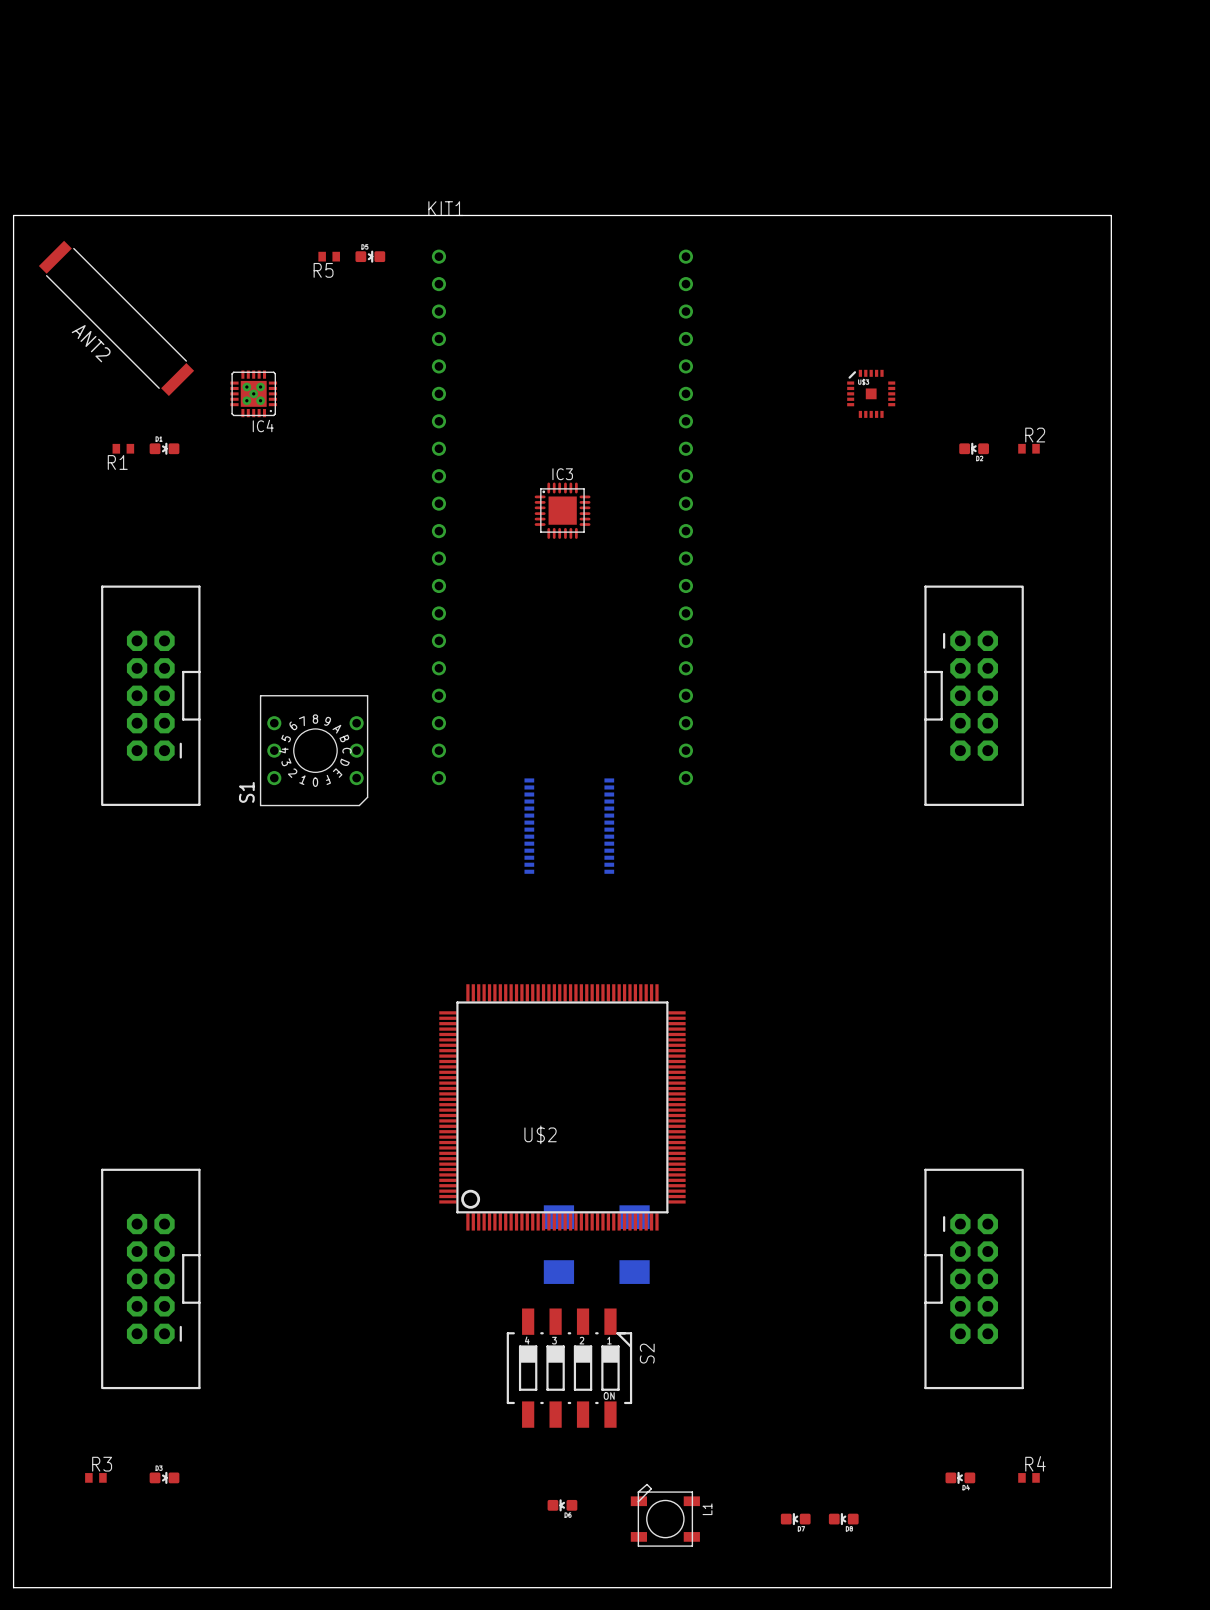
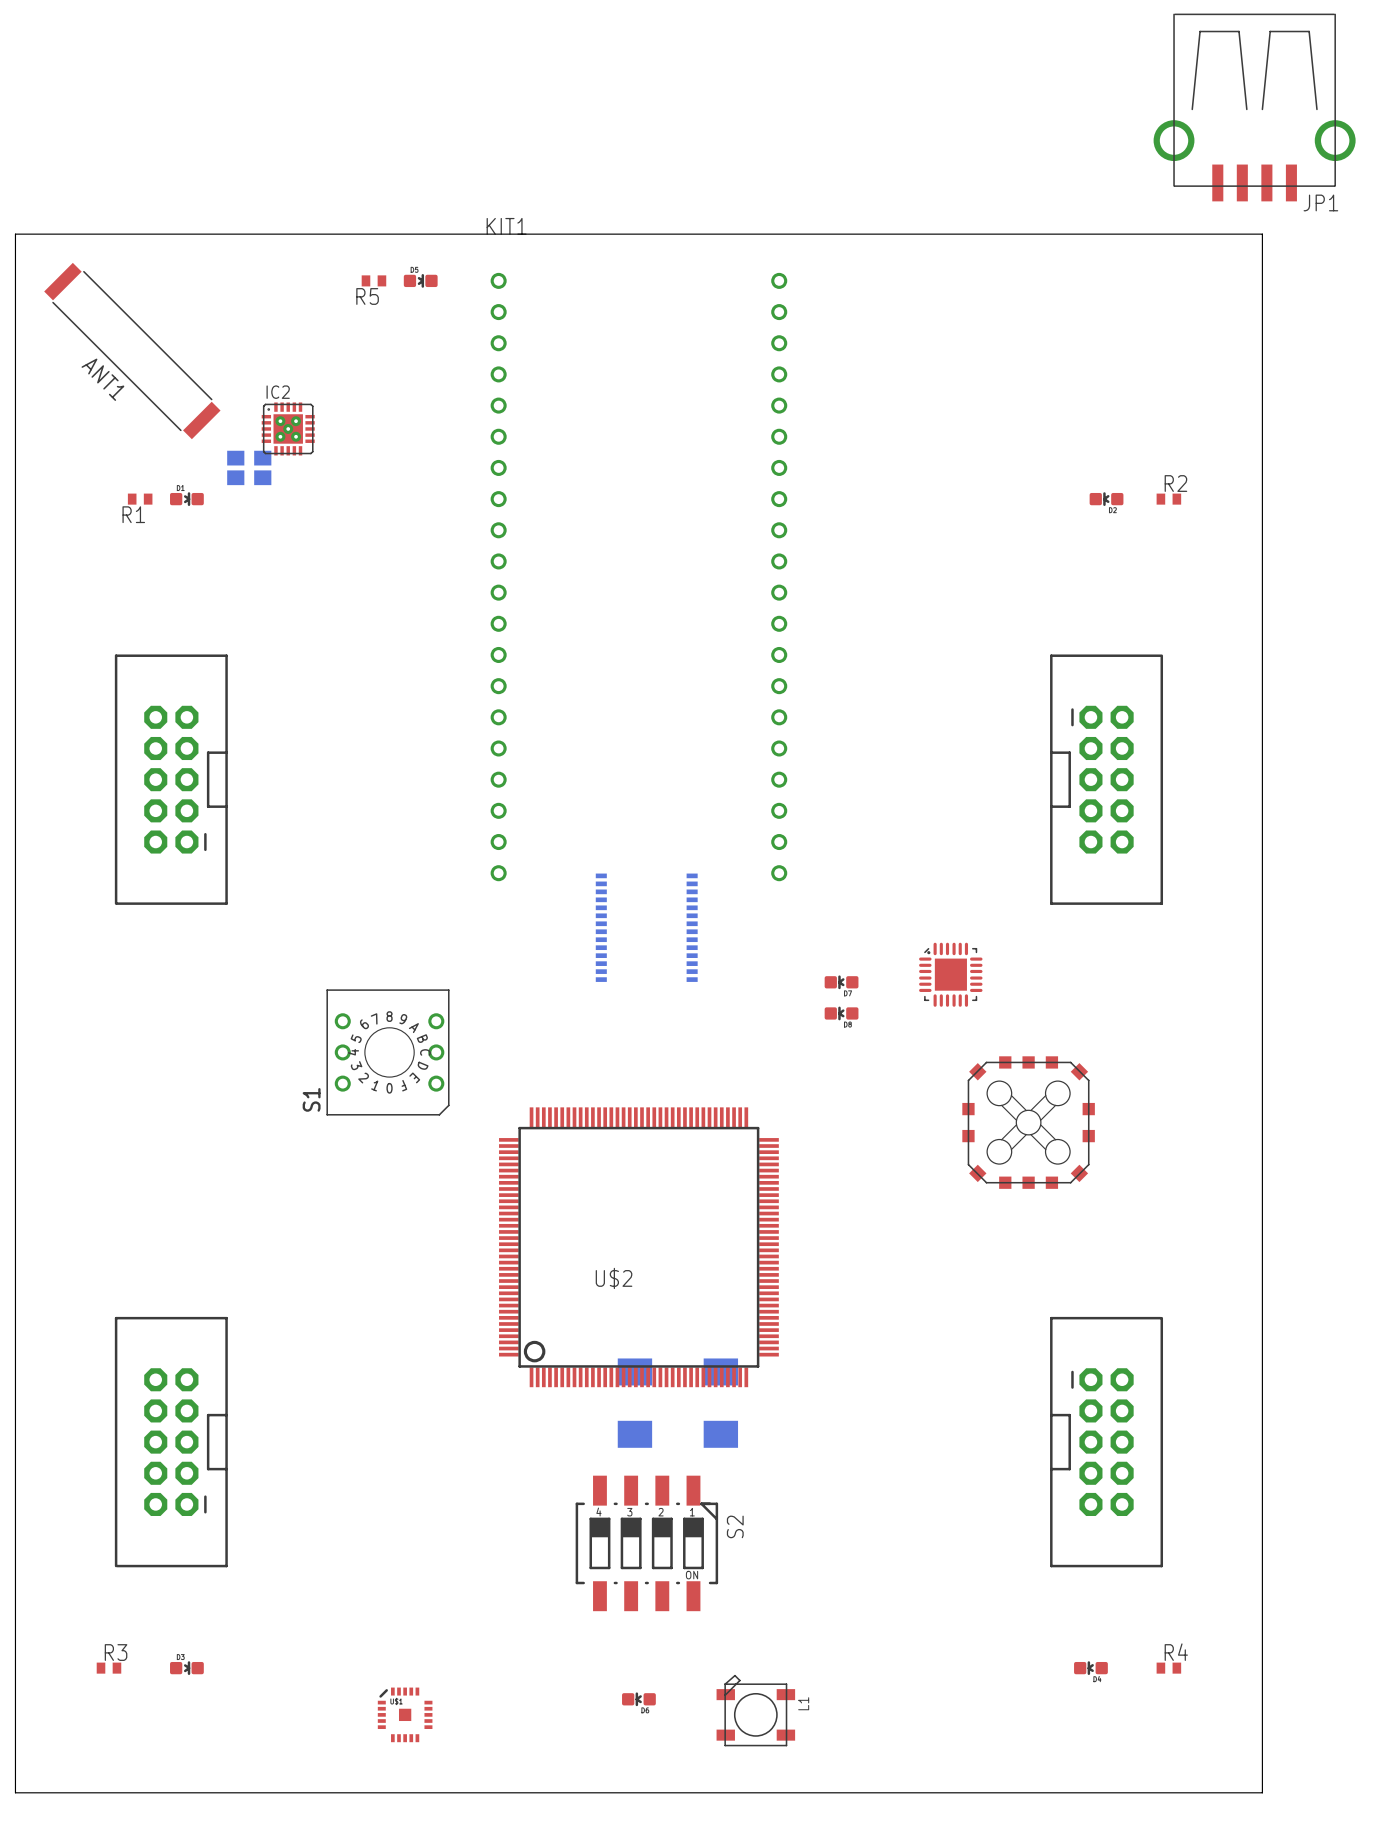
JP1: none -> (1254, 107)
ANT2 name: ANT2 (91, 343) -> ANT1 (102, 379)
IC2: none -> (288, 428)
IC4: (253, 393) -> none
part: (871, 393) -> none
part: none -> (249, 467)
IC3: (562, 510) -> none
S1 position: (314, 750) -> (387, 1052)
part: none -> (950, 974)
part: none -> (1028, 1122)
part: none -> (405, 1714)
part position: (795, 1519) -> (841, 982)
part position: (843, 1519) -> (841, 1013)

